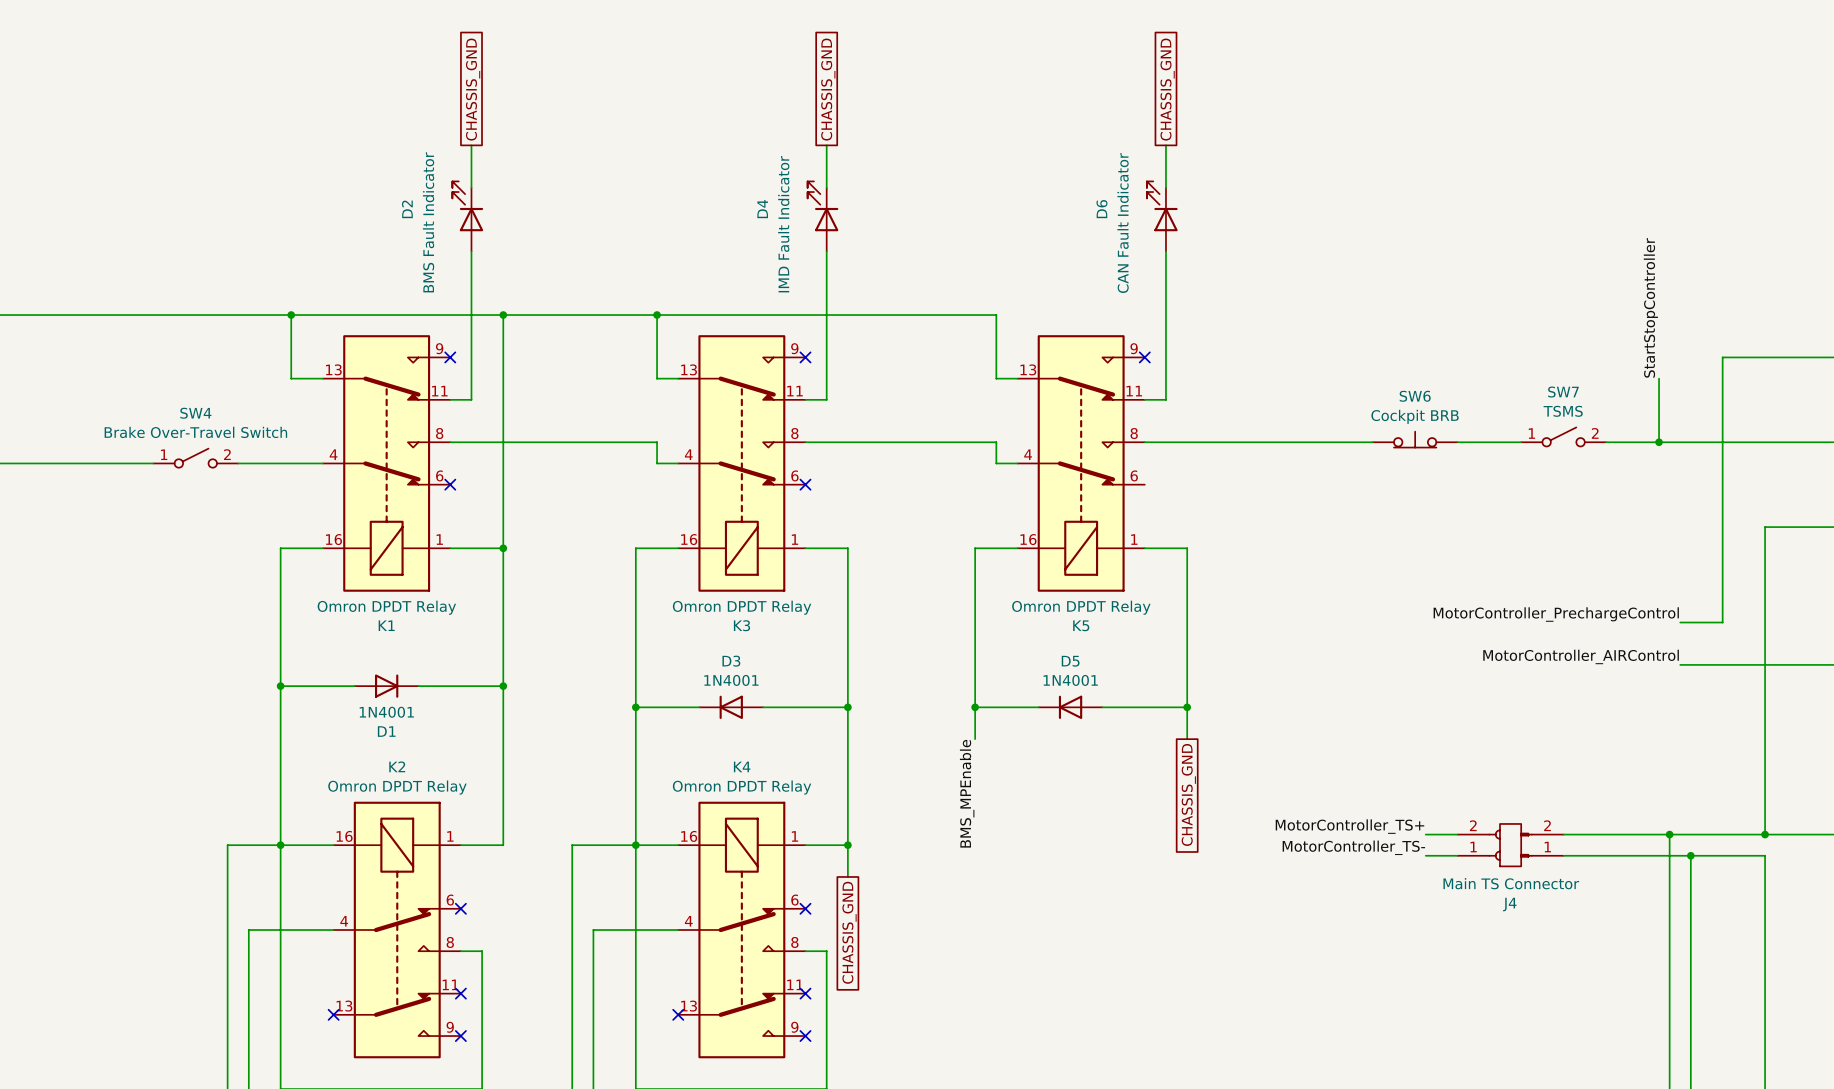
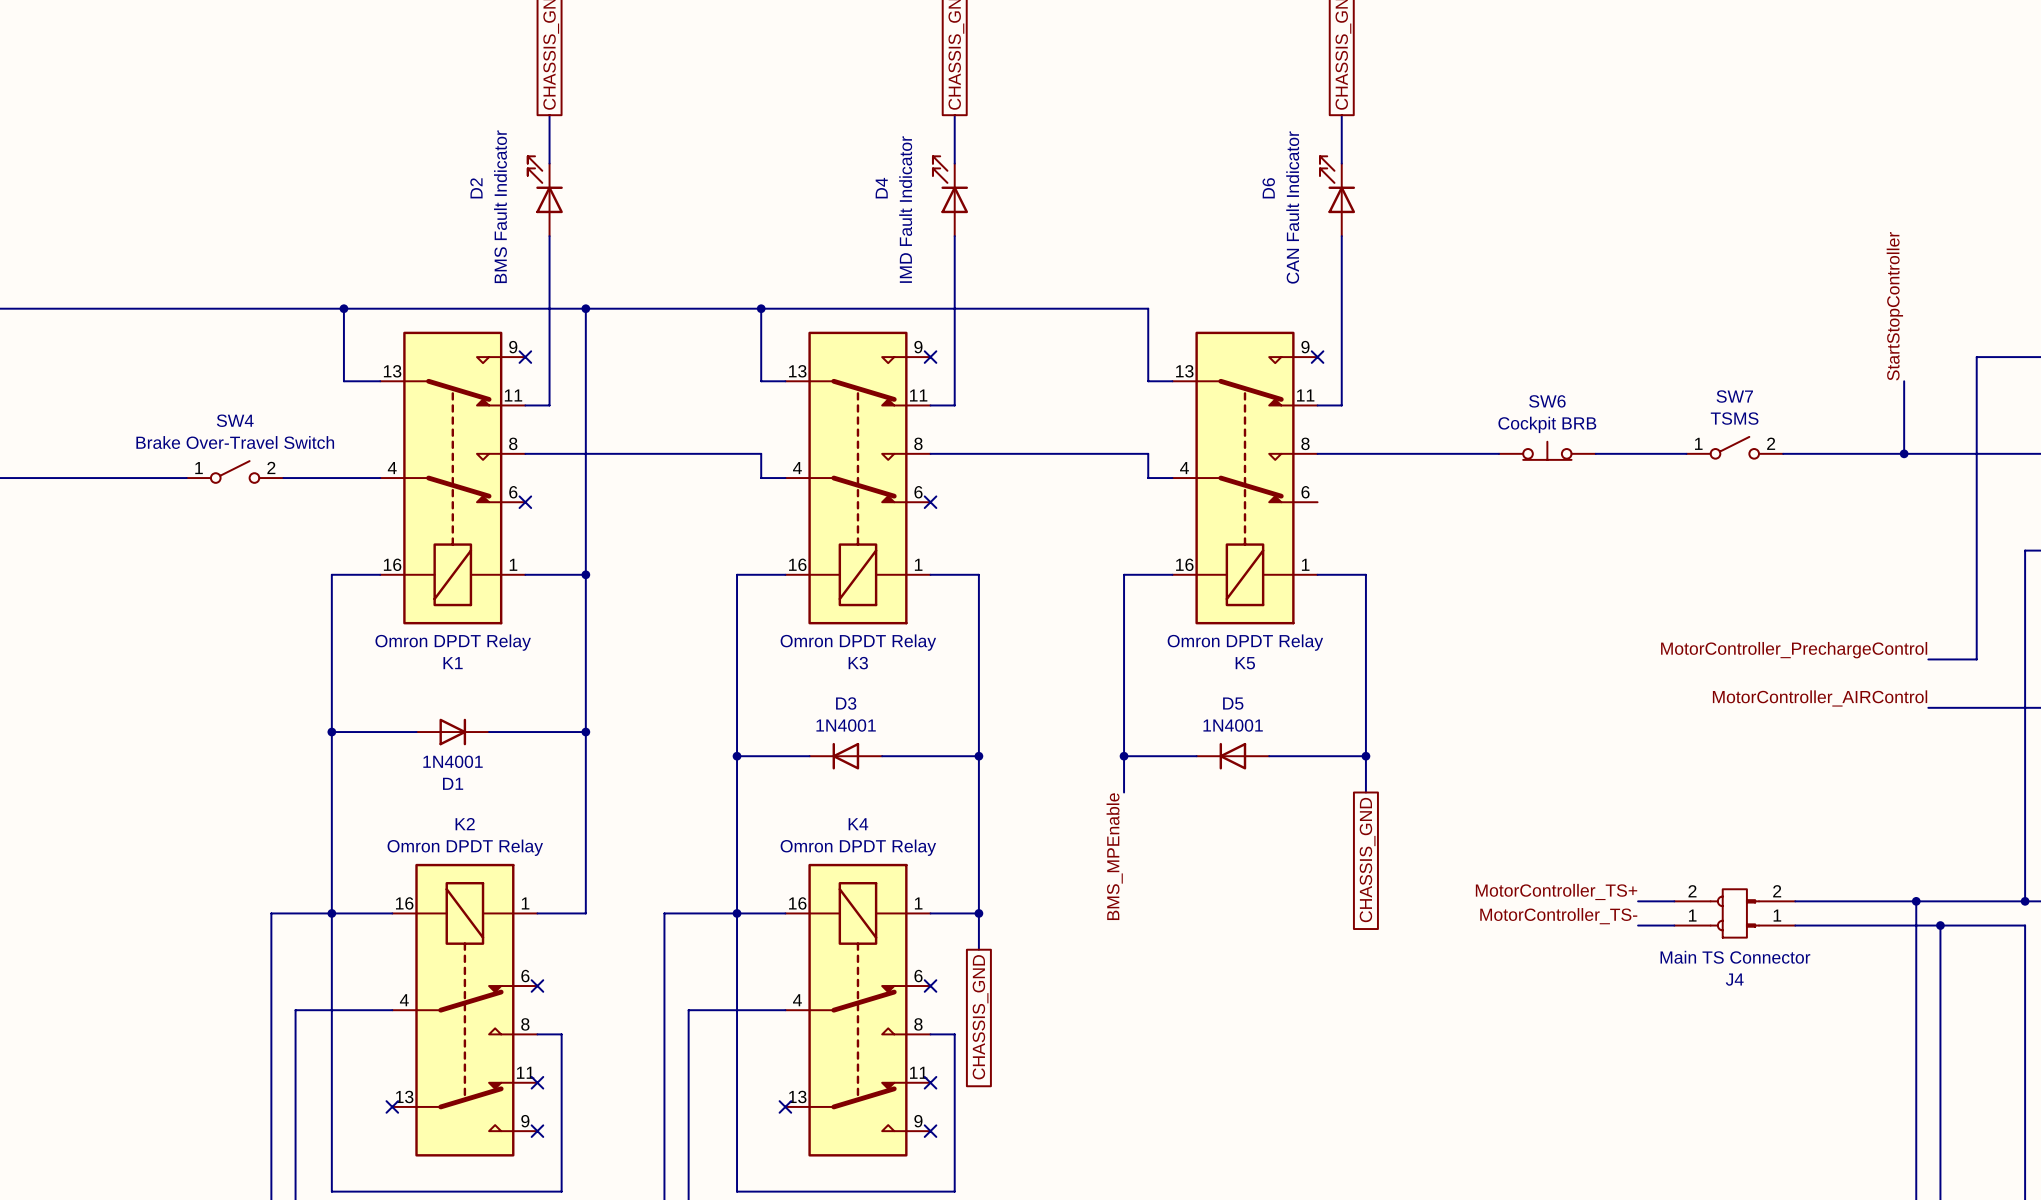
SW7 position: (1563, 436) -> (1734, 447)
SW6 position: (1415, 439) -> (1547, 450)
wire: (1303, 442) (1372, 442) -> (1595, 453) (1674, 453)
wire: (1468, 442) (1521, 442) -> (1783, 453) (1843, 453)

